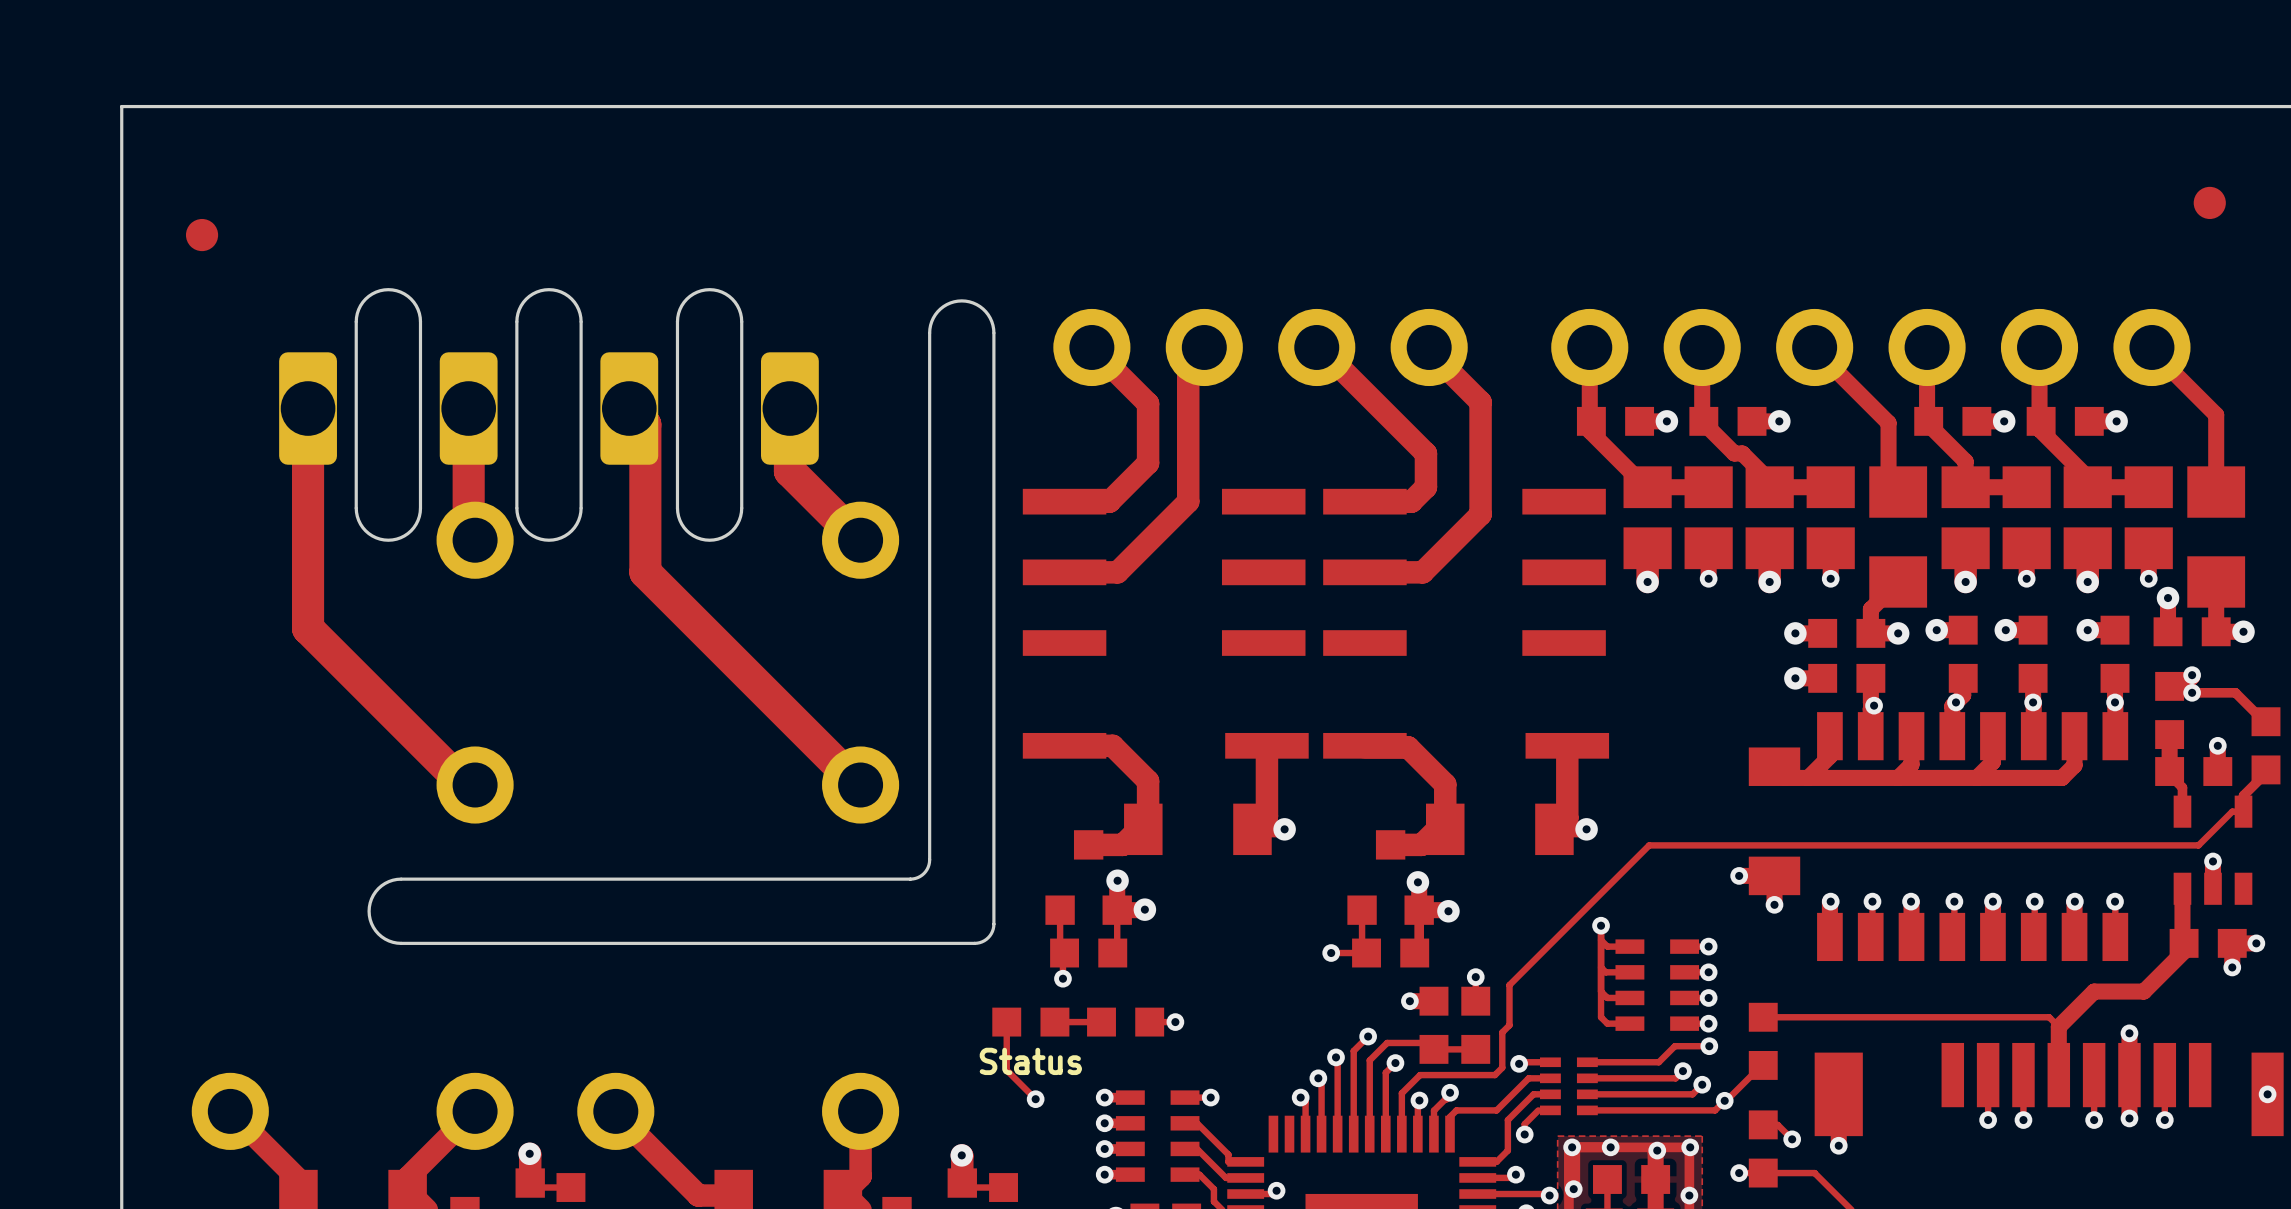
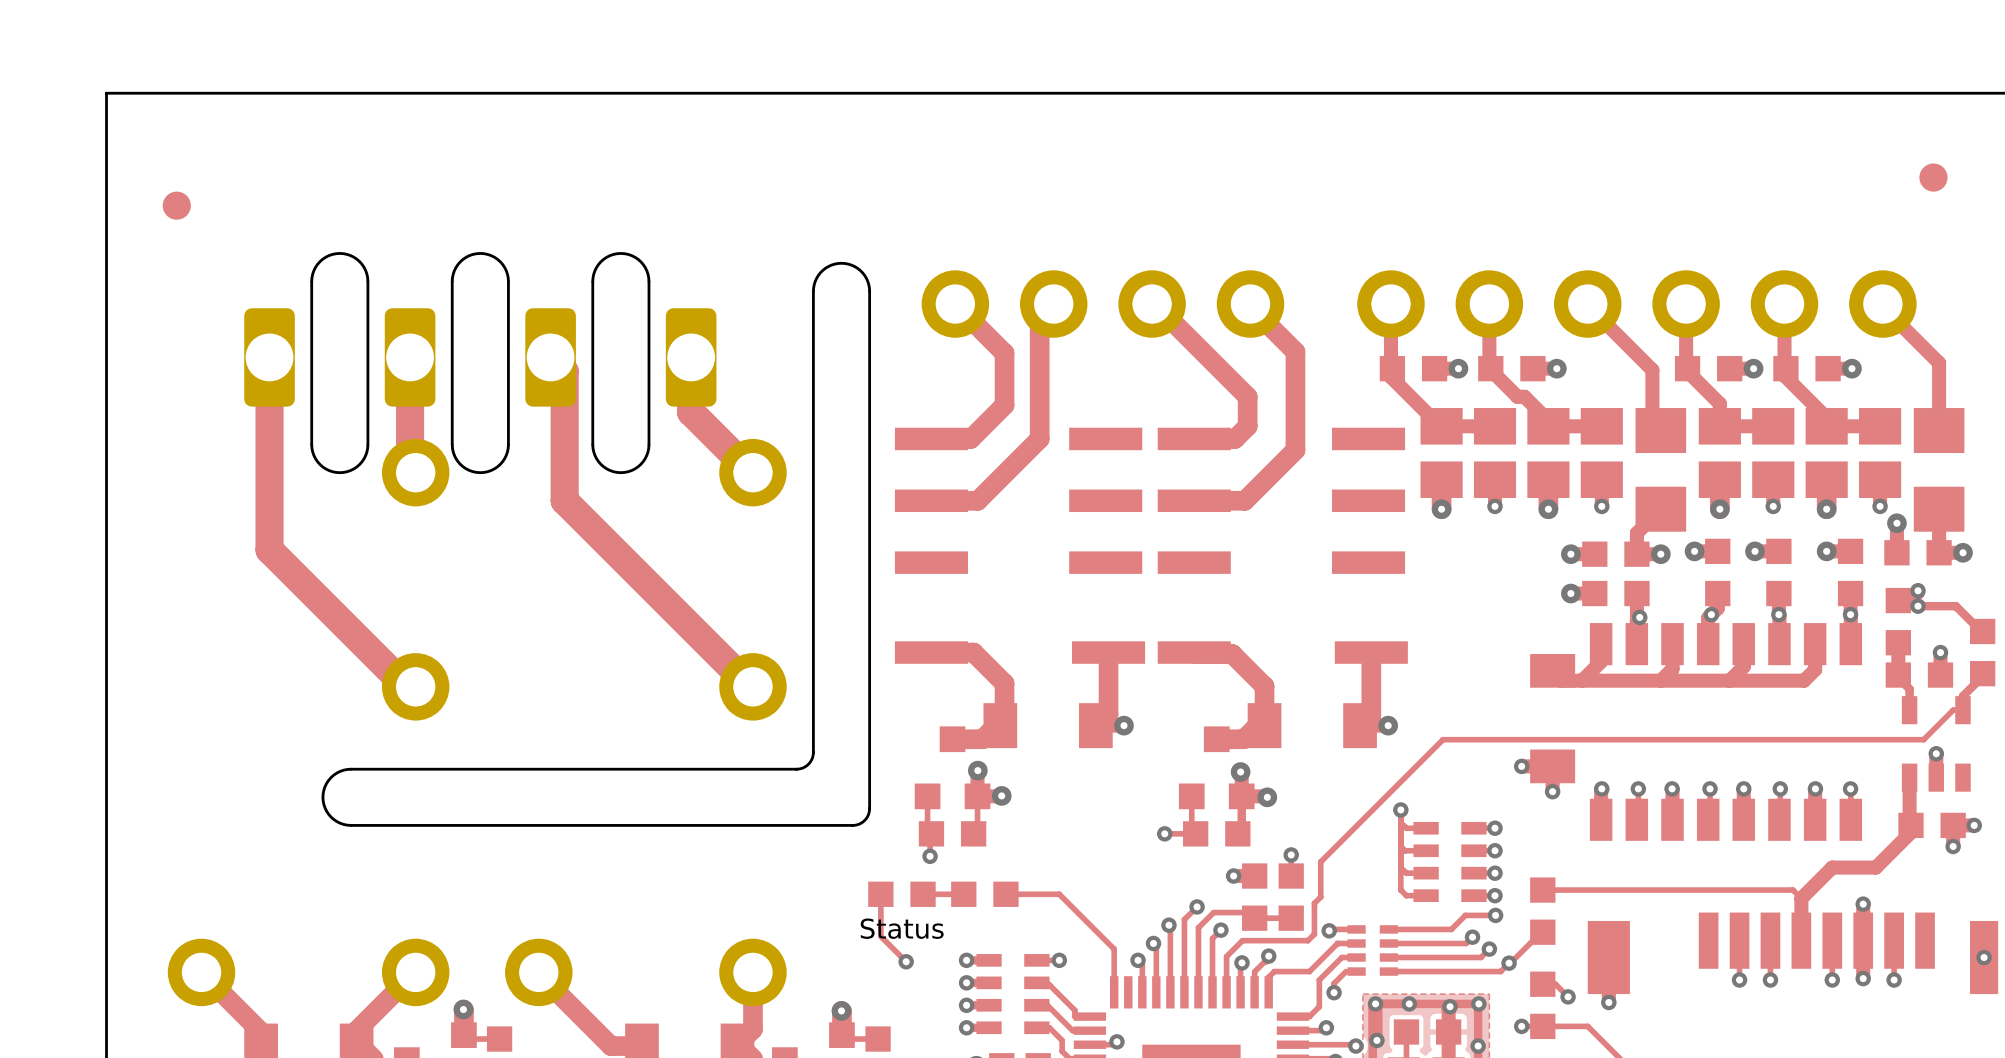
track: none -> (1028, 894) (1059, 894) (1114, 949) (1114, 992)
via: (1175, 1022) -> none

